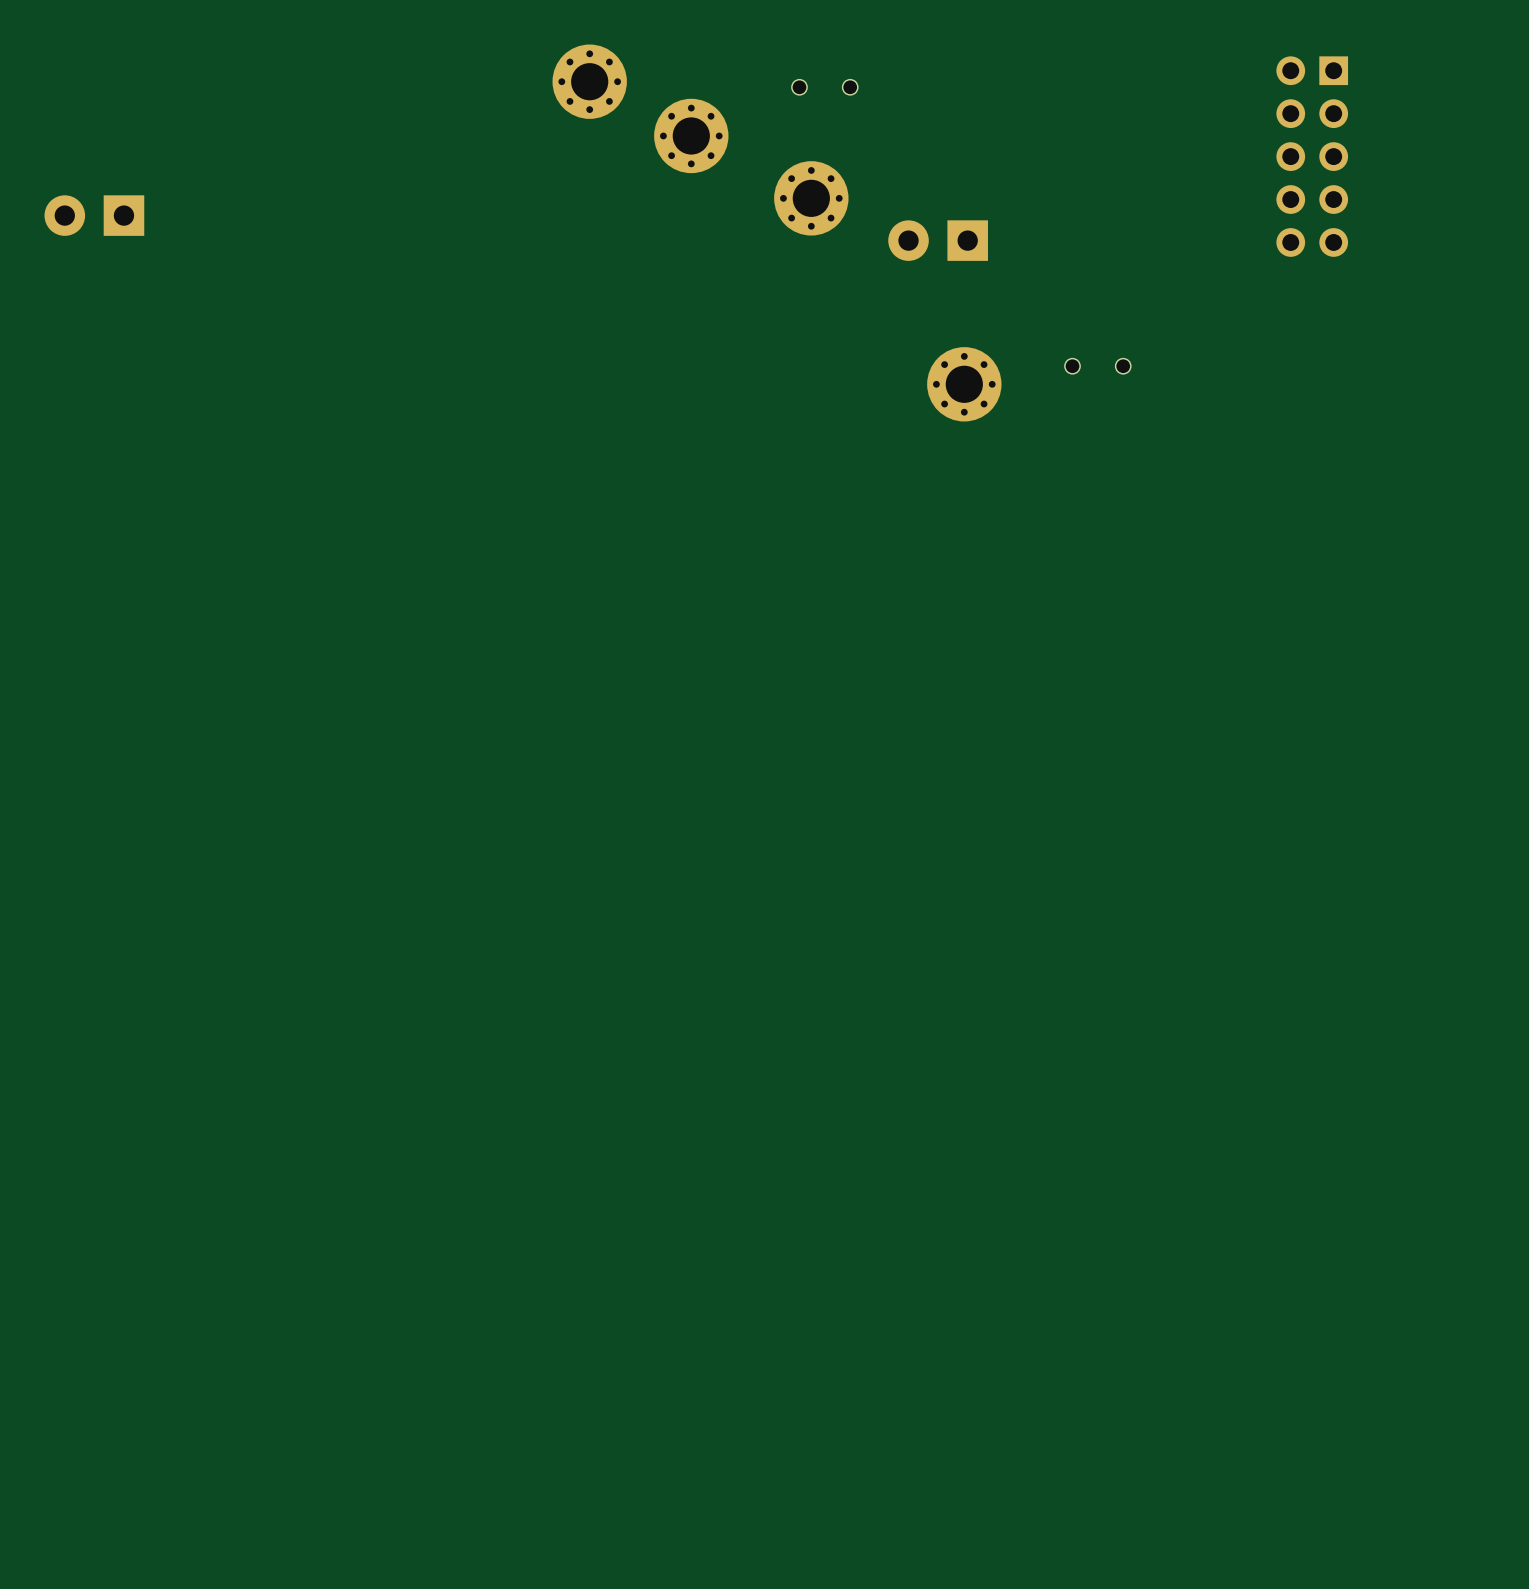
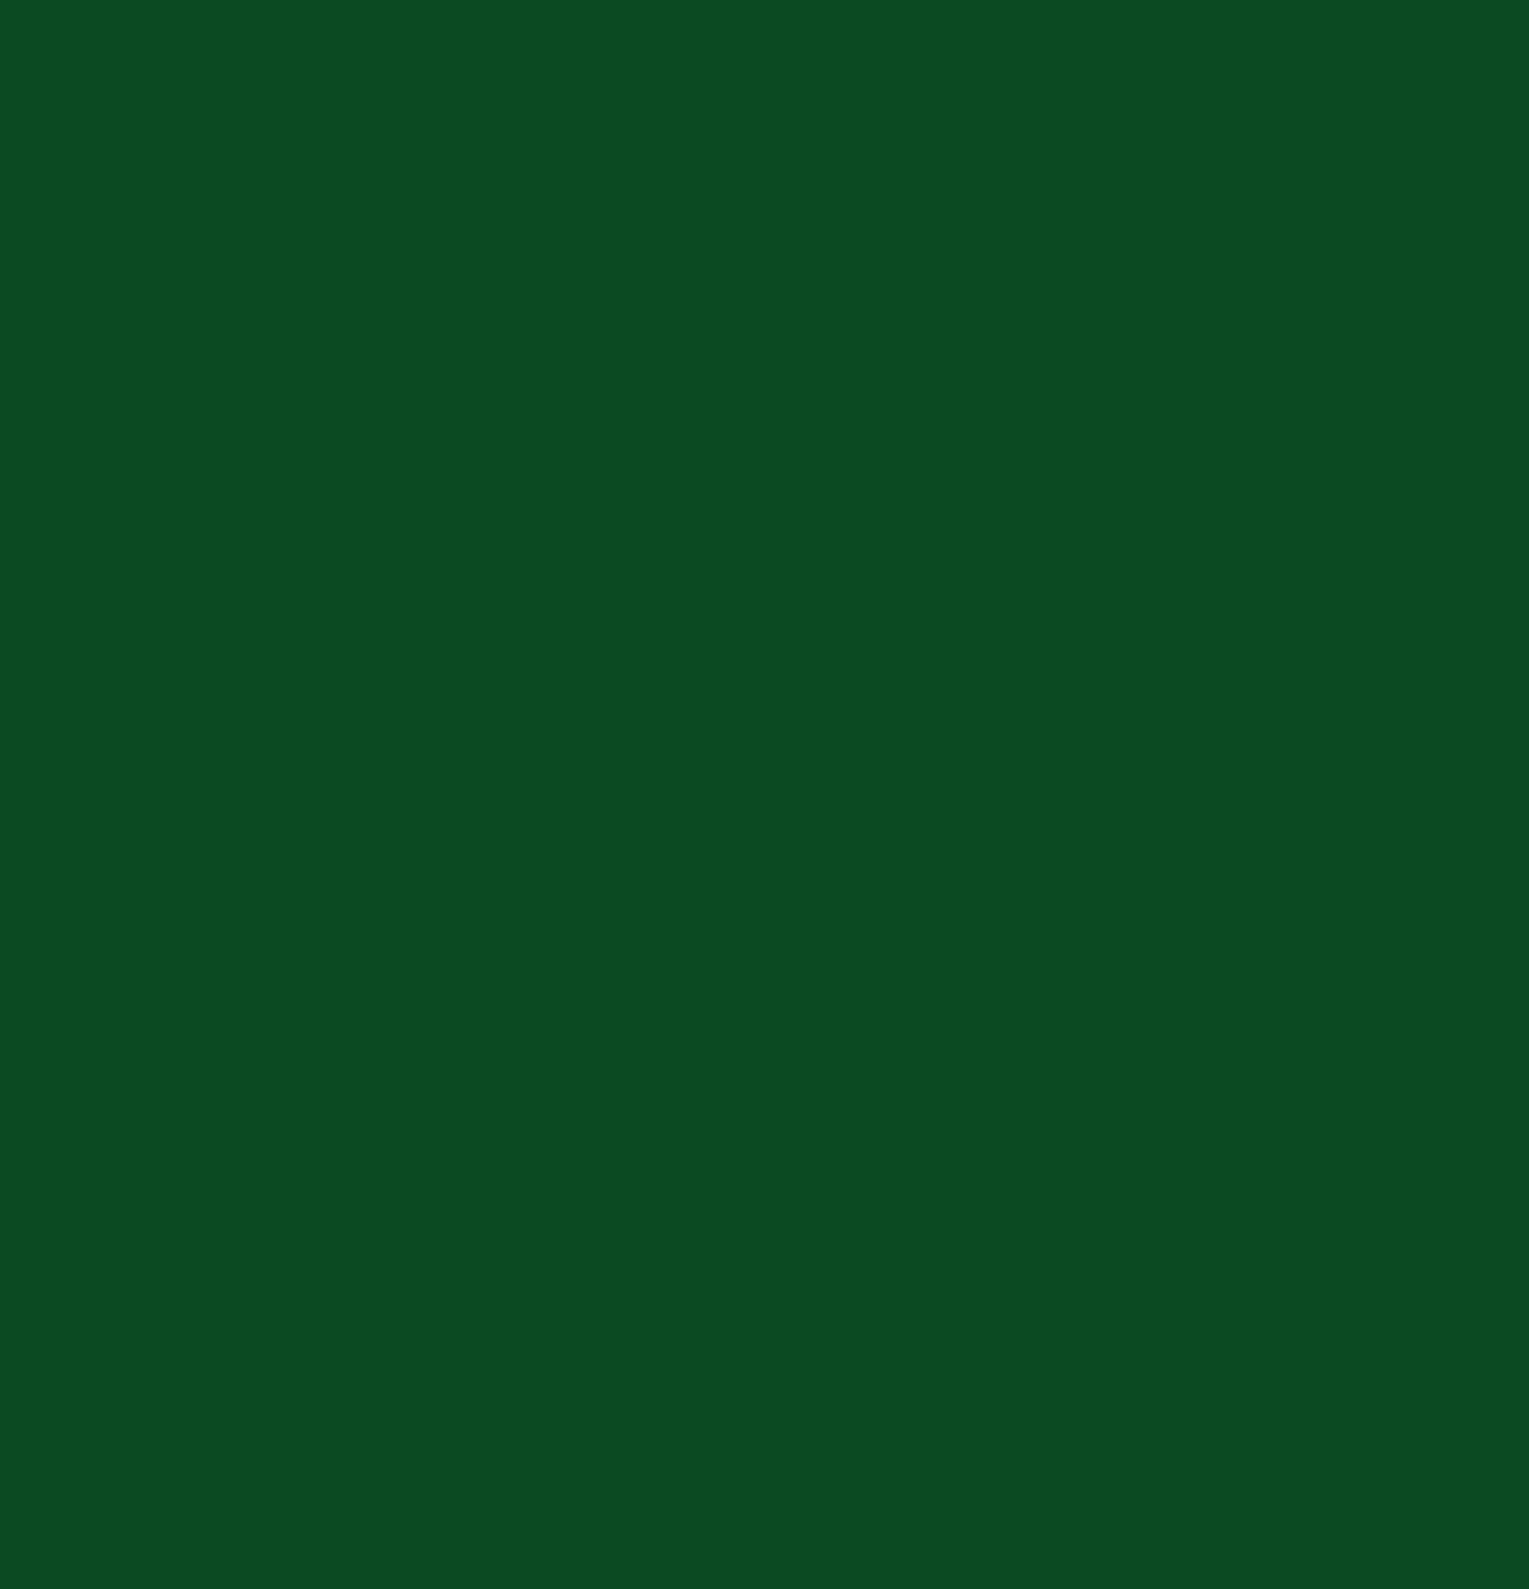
part: (589, 81) -> none
part: (824, 87) -> none
part: (691, 135) -> none
part: (1312, 156) -> none
part: (811, 198) -> none
part: (94, 215) -> none
part: (938, 240) -> none
part: (1097, 366) -> none
part: (964, 384) -> none

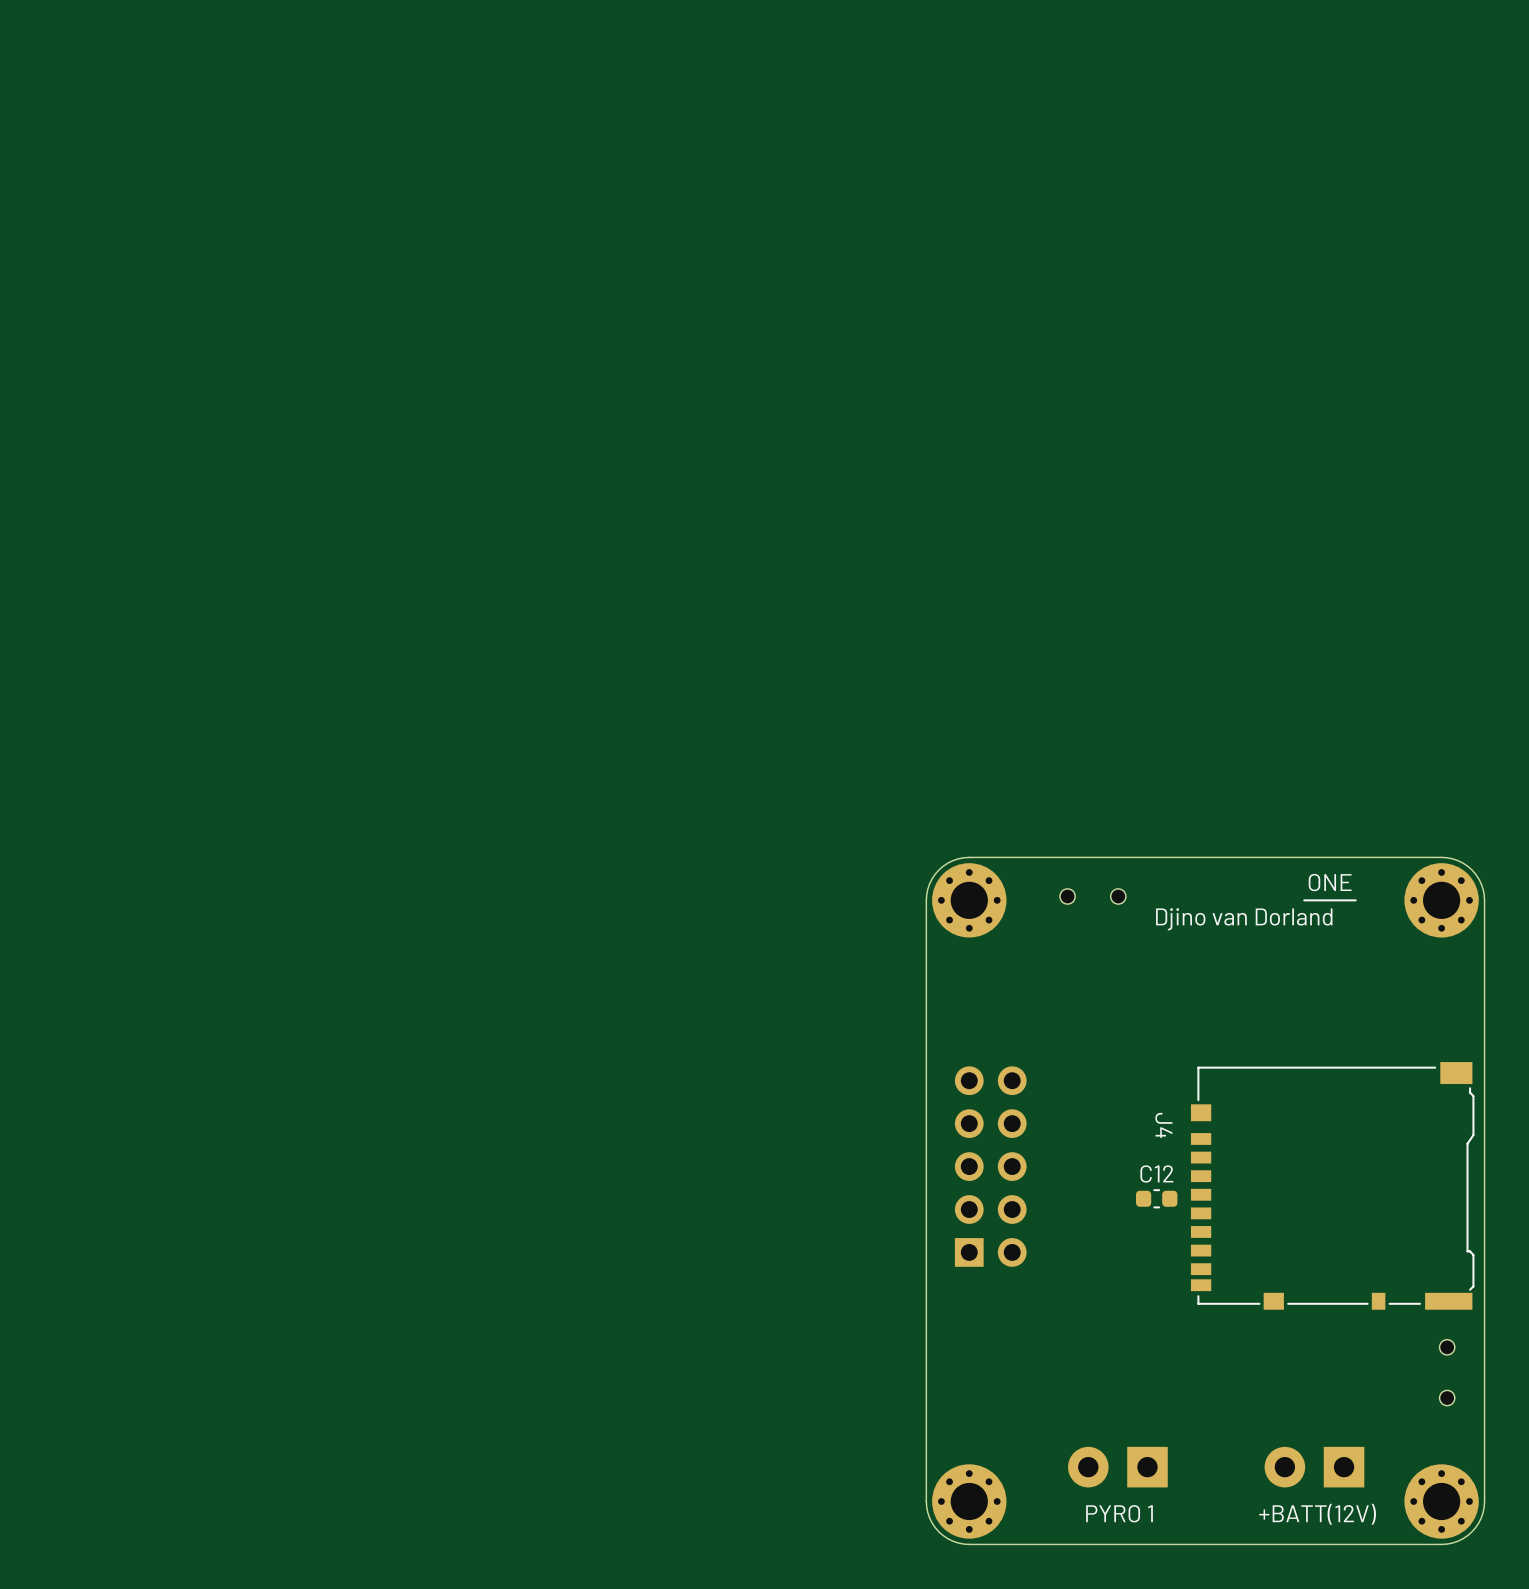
board edge: none -> (1441, 857) (969, 857) (947, 863) (935, 874) (927, 889) (926, 900) (926, 1501) (929, 1517) (943, 1535) (958, 1542) (969, 1544) (1441, 1544) (1458, 1541) (1475, 1527) (1483, 1512) (1484, 1501) (1484, 900) (1481, 883) (1471, 869) (1458, 860) (1441, 857)
text: none -> ONE (1330, 882)
part: none -> (1092, 896)
part: none -> (969, 900)
line: none -> (1355, 900) (1304, 900)
part: none -> (1441, 900)
text: none -> Djino van Dorland (1244, 919)
part: none -> (990, 1166)
J4: none -> (1332, 1185)
C12: none -> (1156, 1198)
part: none -> (1447, 1372)
part: none -> (1117, 1467)
part: none -> (1314, 1467)
part: none -> (969, 1501)
part: none -> (1441, 1501)
text: none -> PYRO 1 (1119, 1513)
text: none -> +BATT(12V) (1317, 1514)

